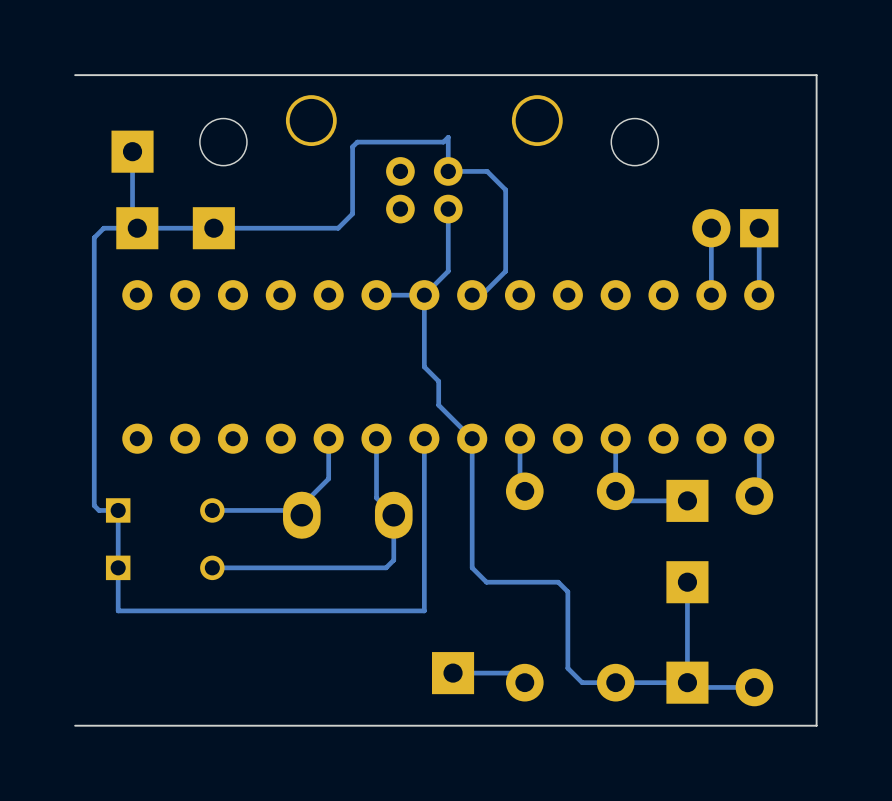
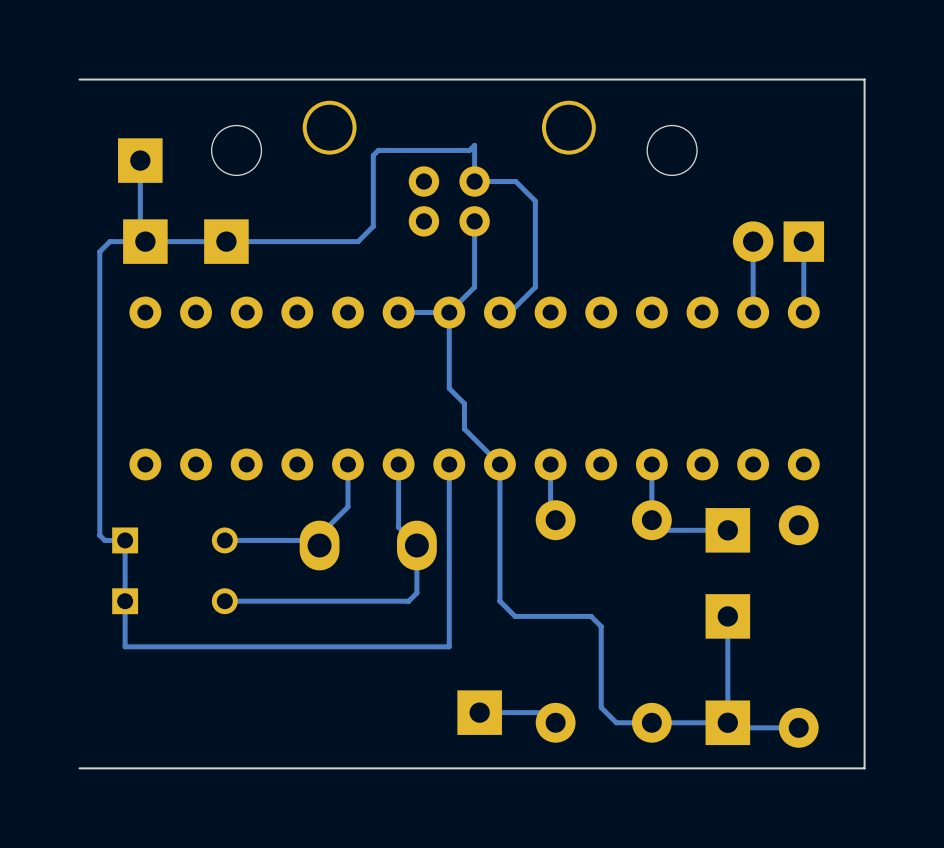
bottom track: (759, 438) (759, 491) (754, 496) -> none

